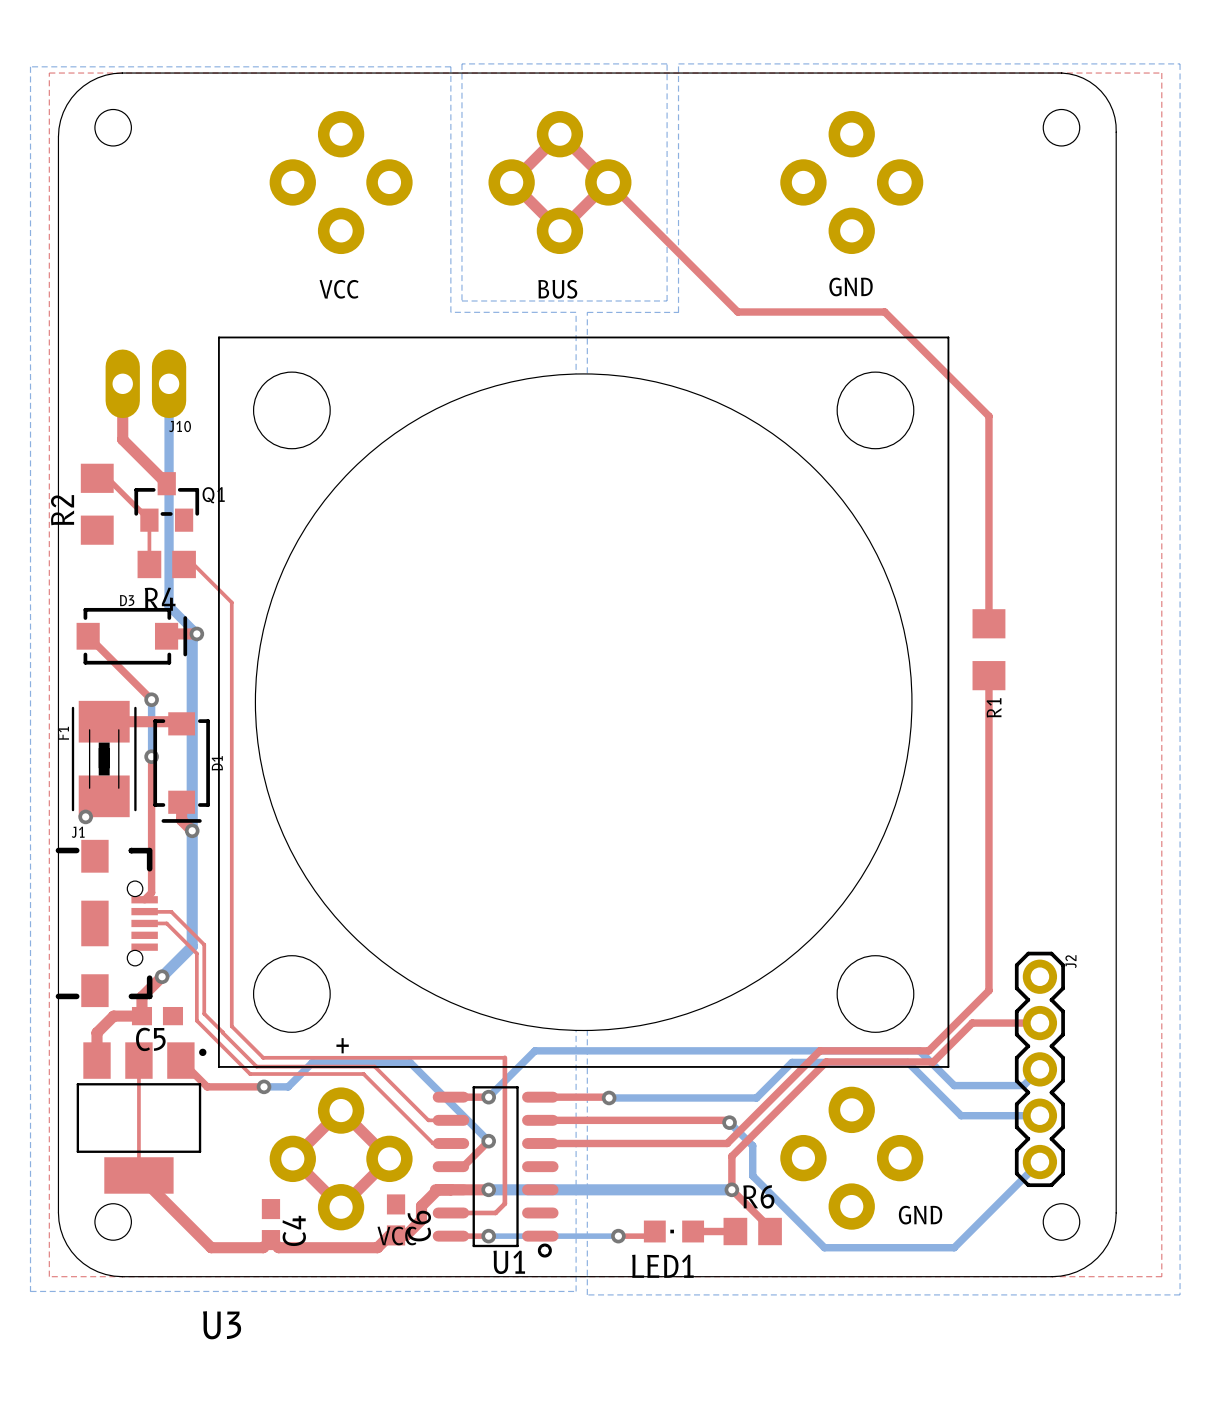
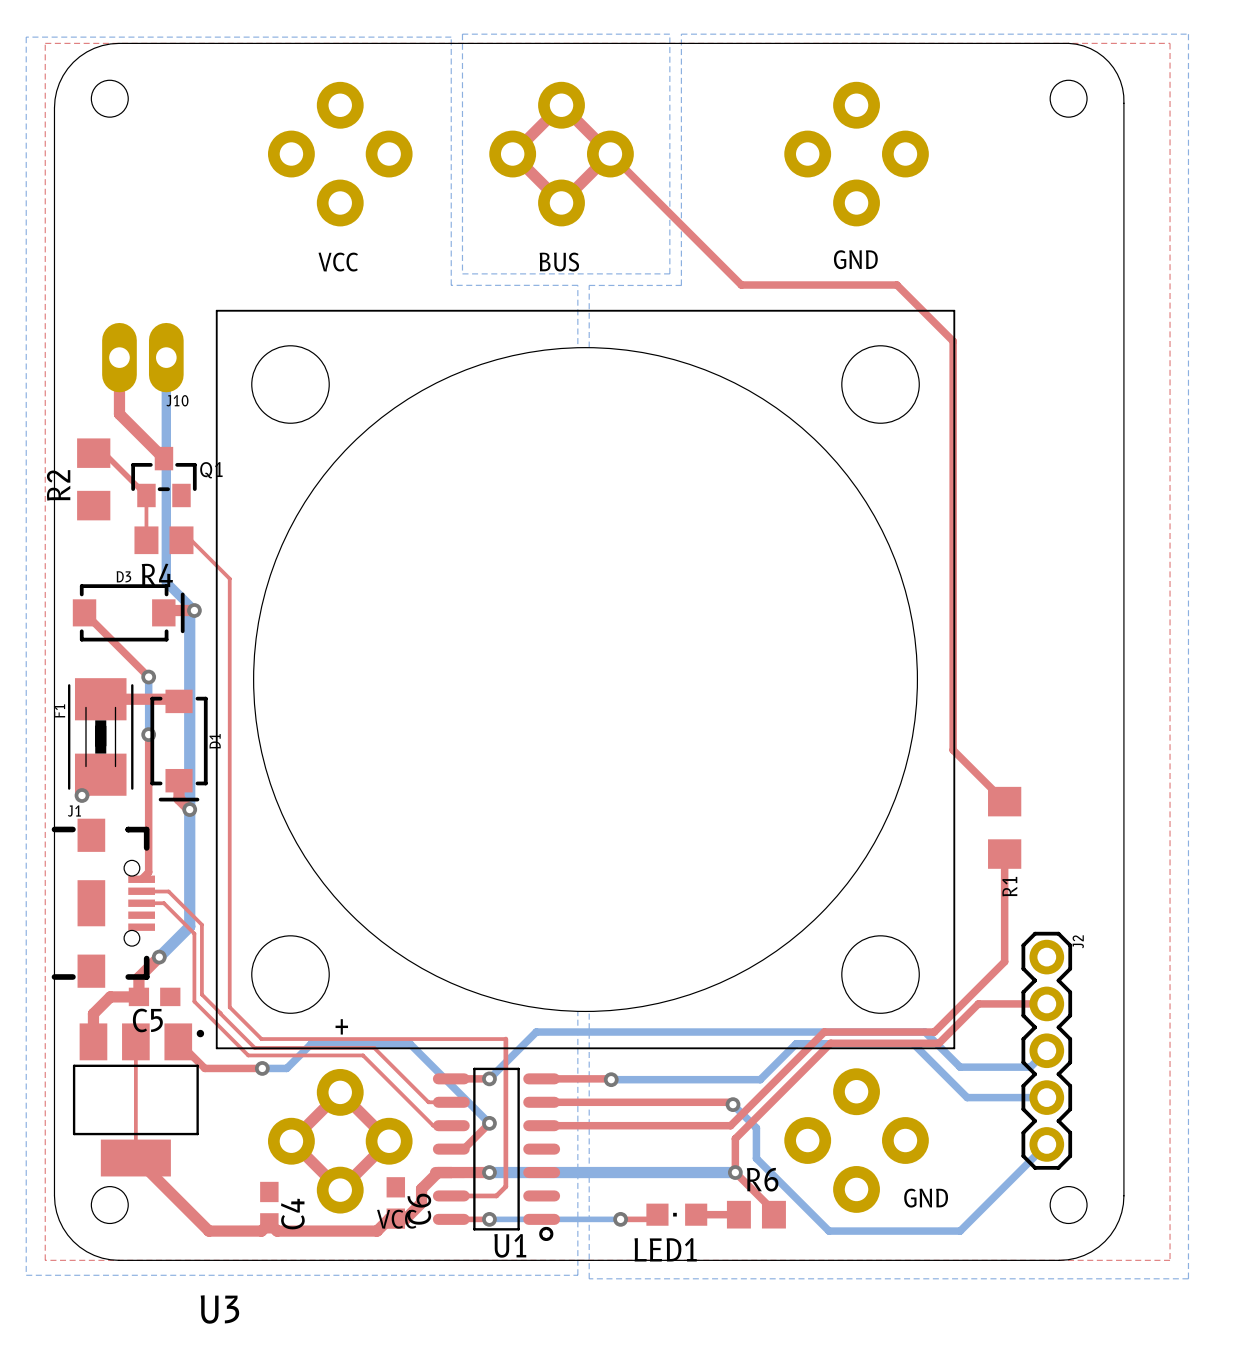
top track: (884, 312) (988, 416) (988, 623) -> (889, 285) (896, 285) (953, 341) (953, 750) (1004, 801)
R1 position: (988, 649) -> (1004, 827)
top track: (988, 675) (988, 990) -> (1004, 854) (1004, 961) (995, 971)

